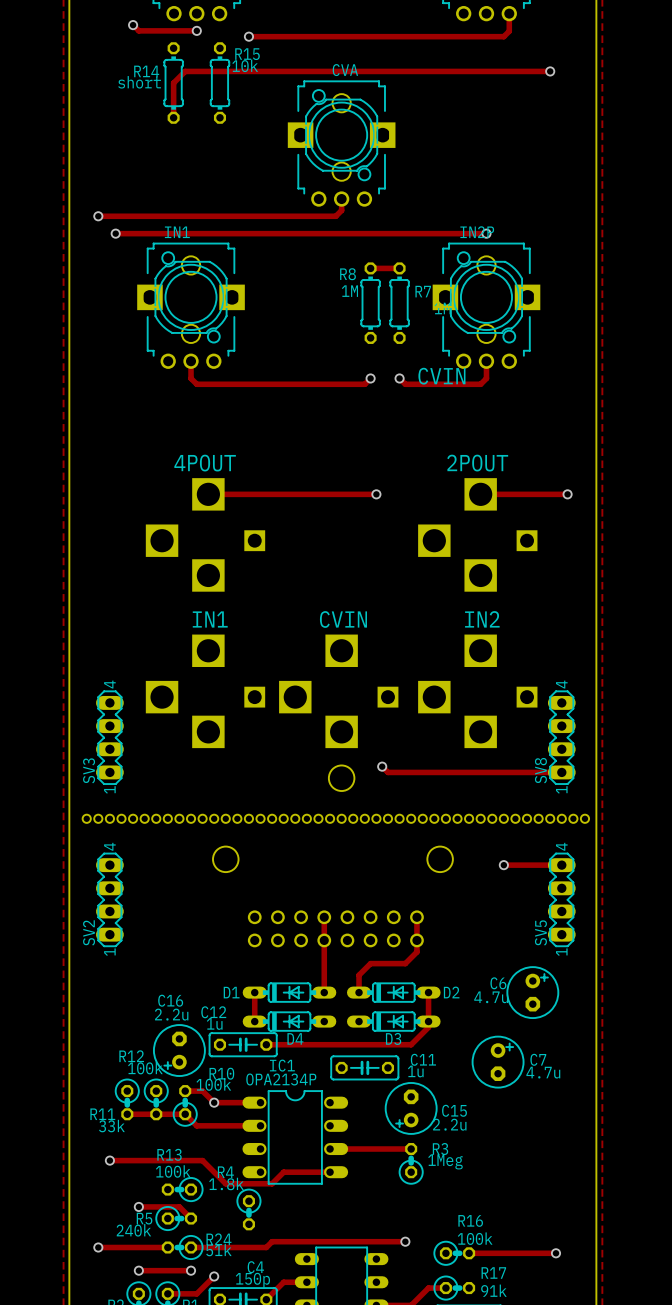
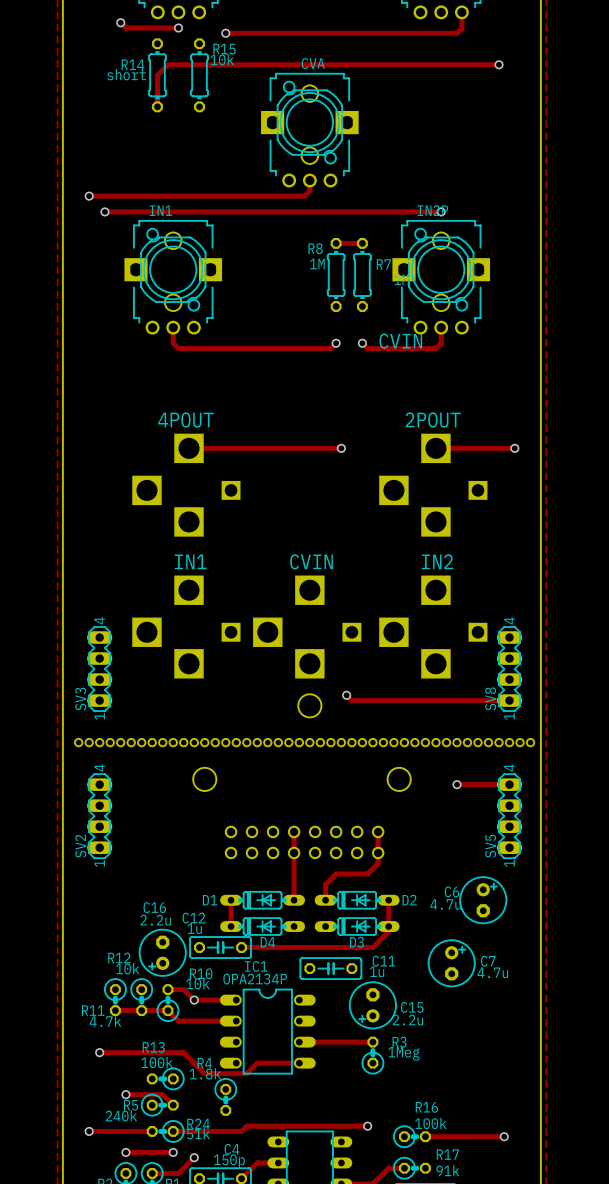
R12 value: 100k (145, 1068) -> 10k (127, 968)
R10 value: 100k (213, 1084) -> 10k (198, 983)
R11 value: 33k (111, 1126) -> 4.7k (105, 1021)

